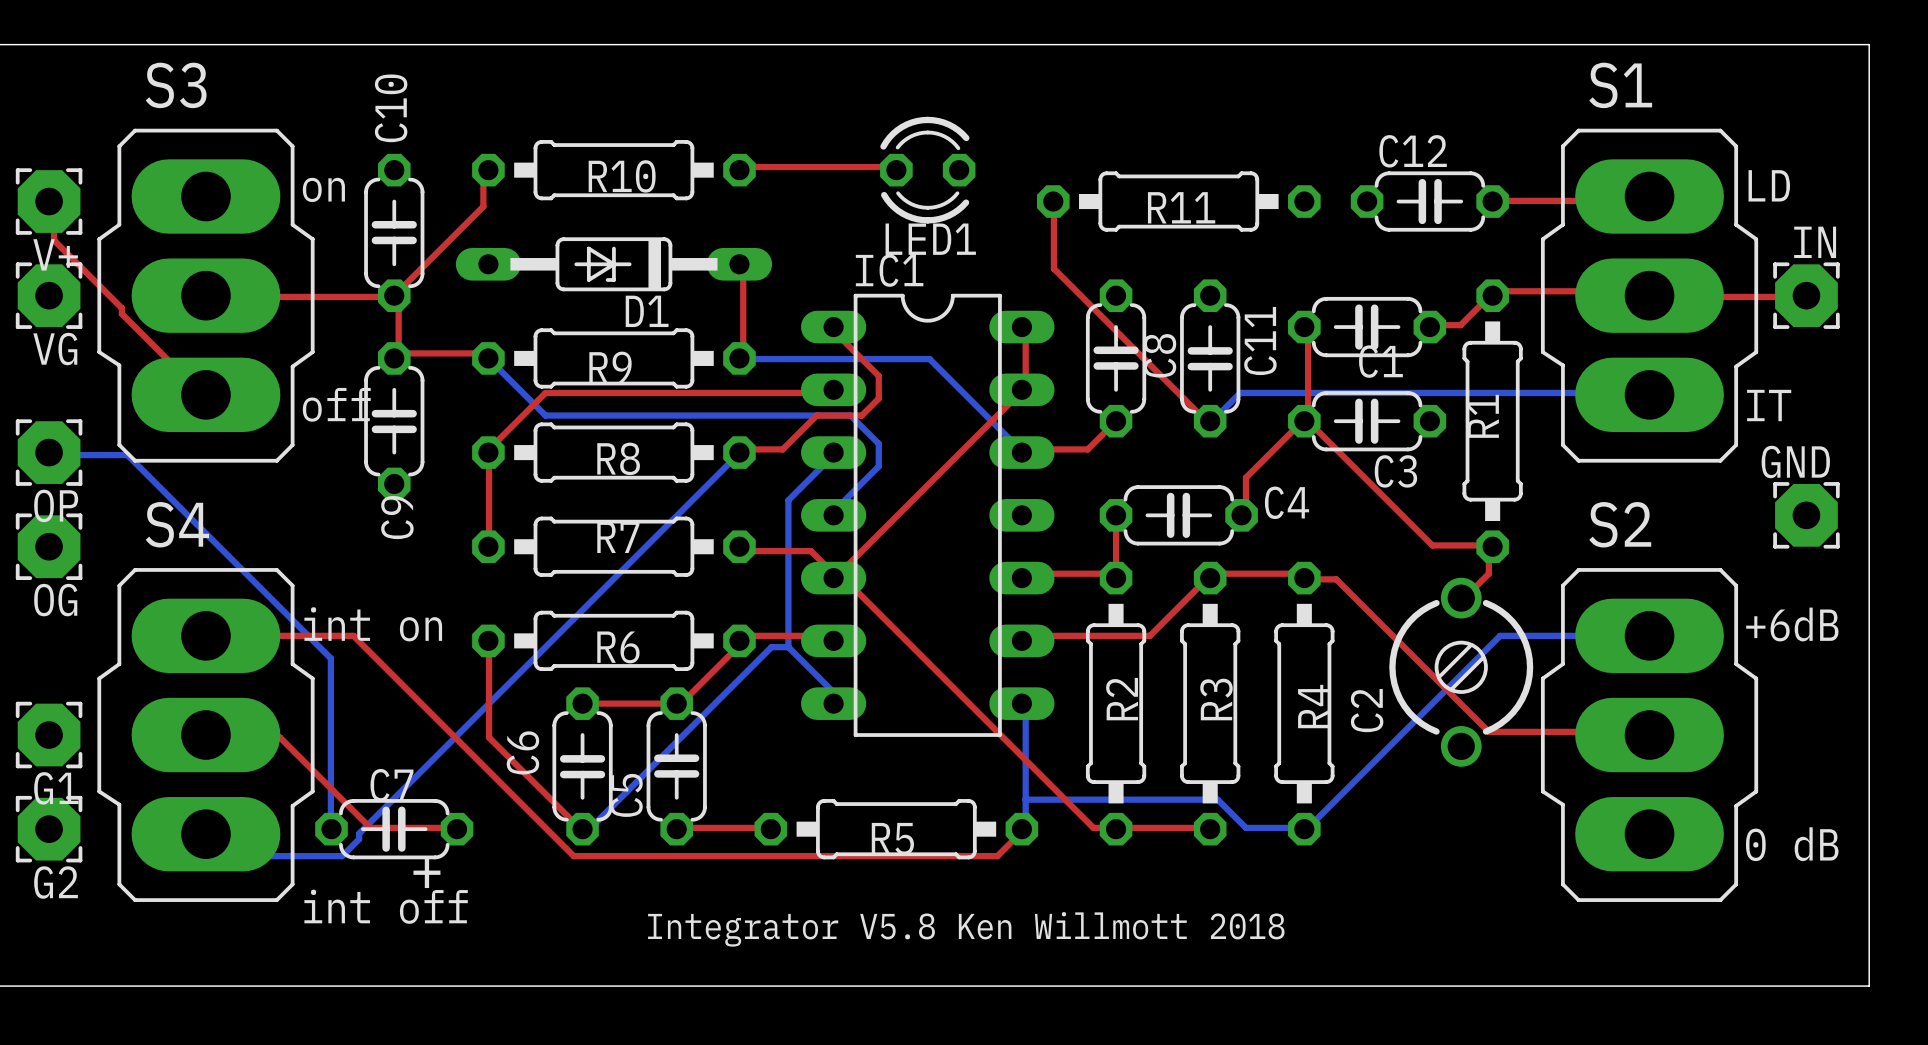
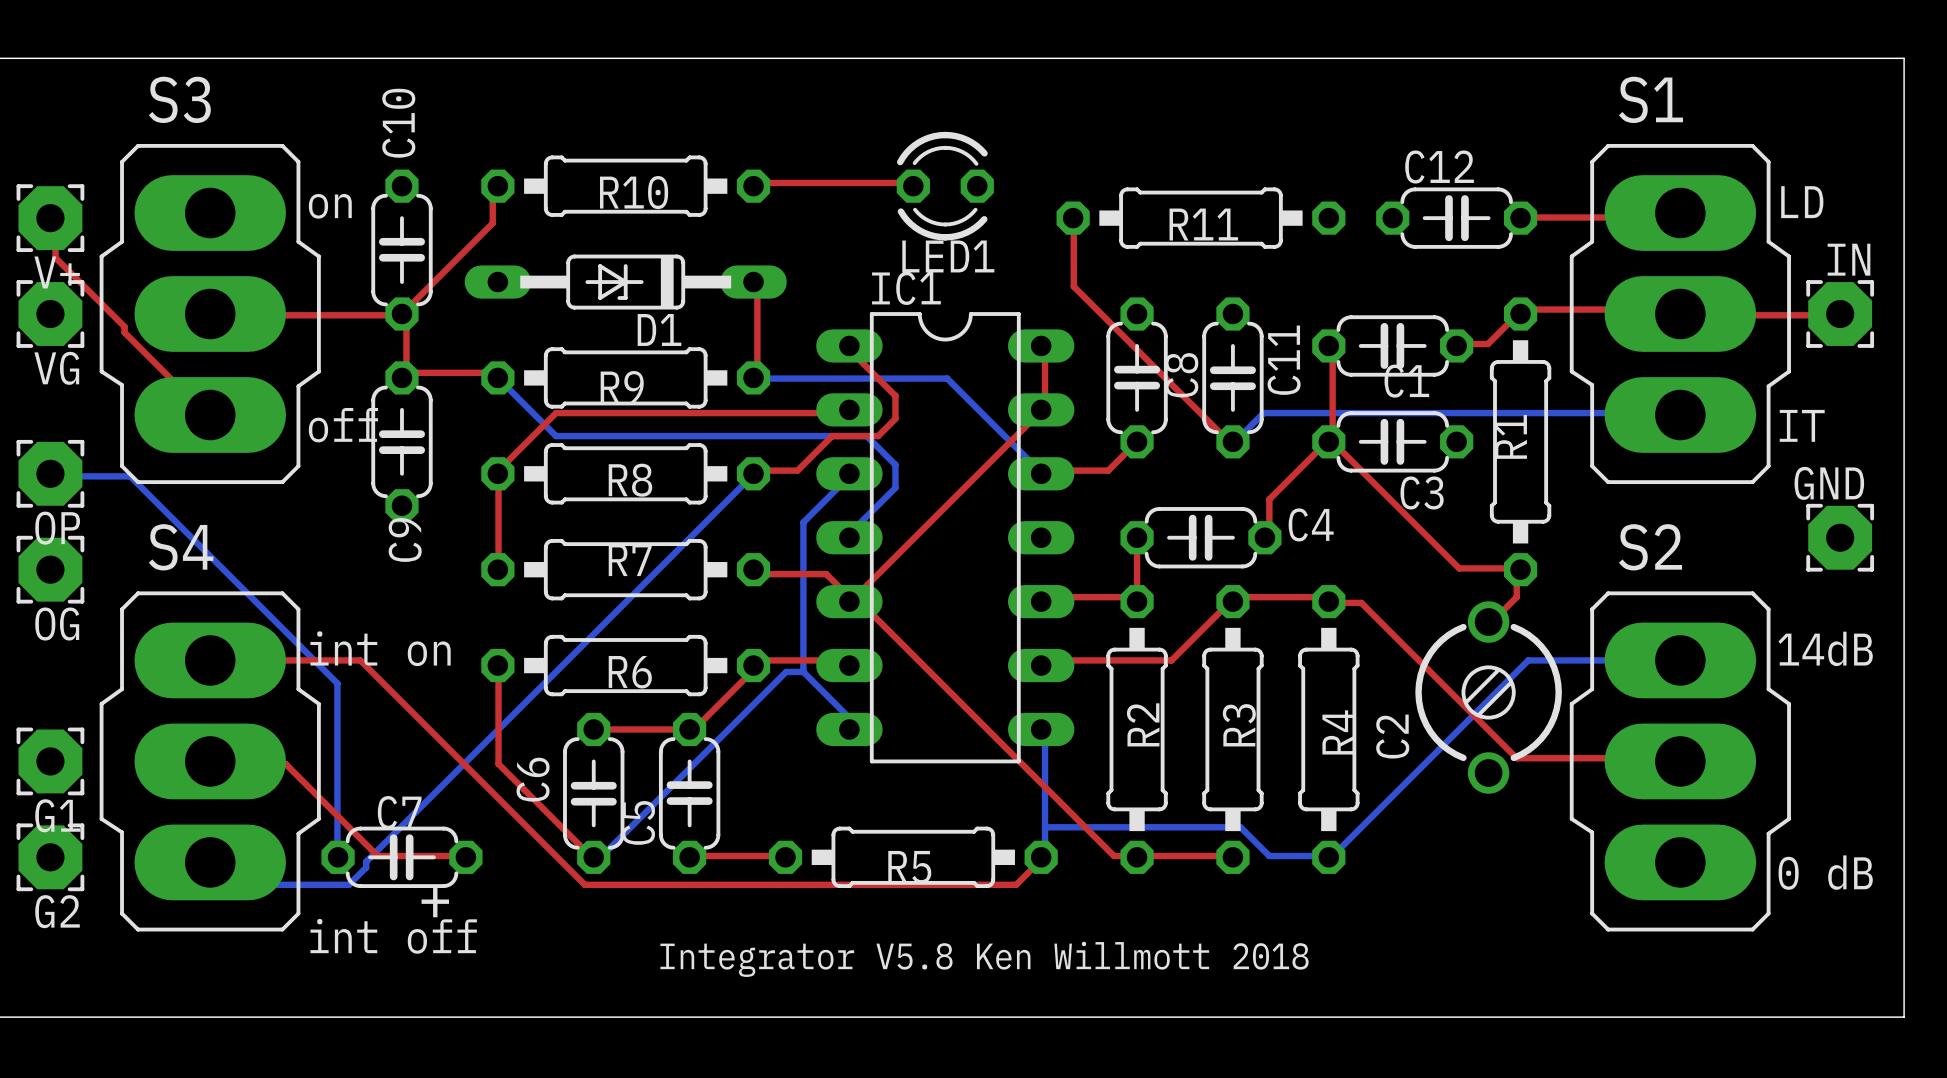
text: +6dB (1792, 624) -> 14dB (1825, 648)

